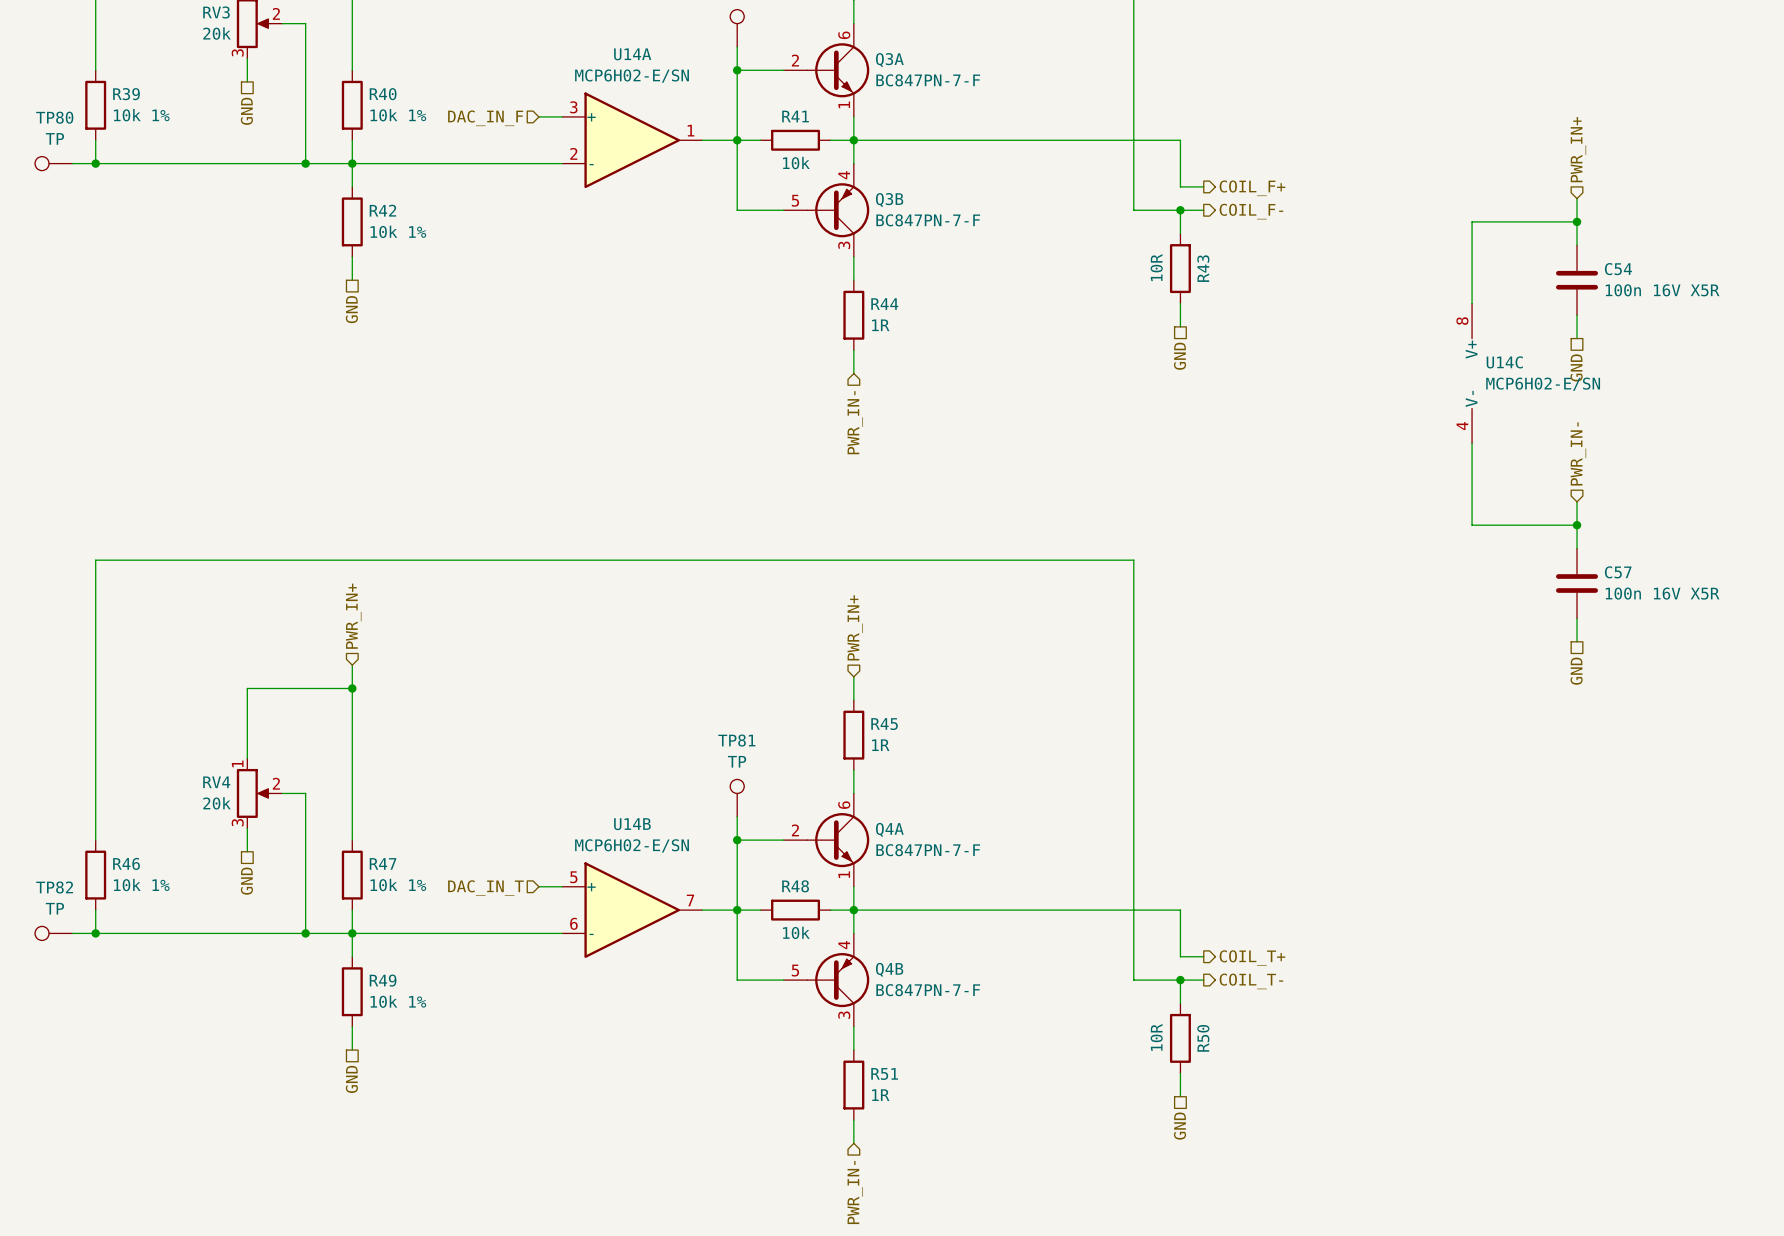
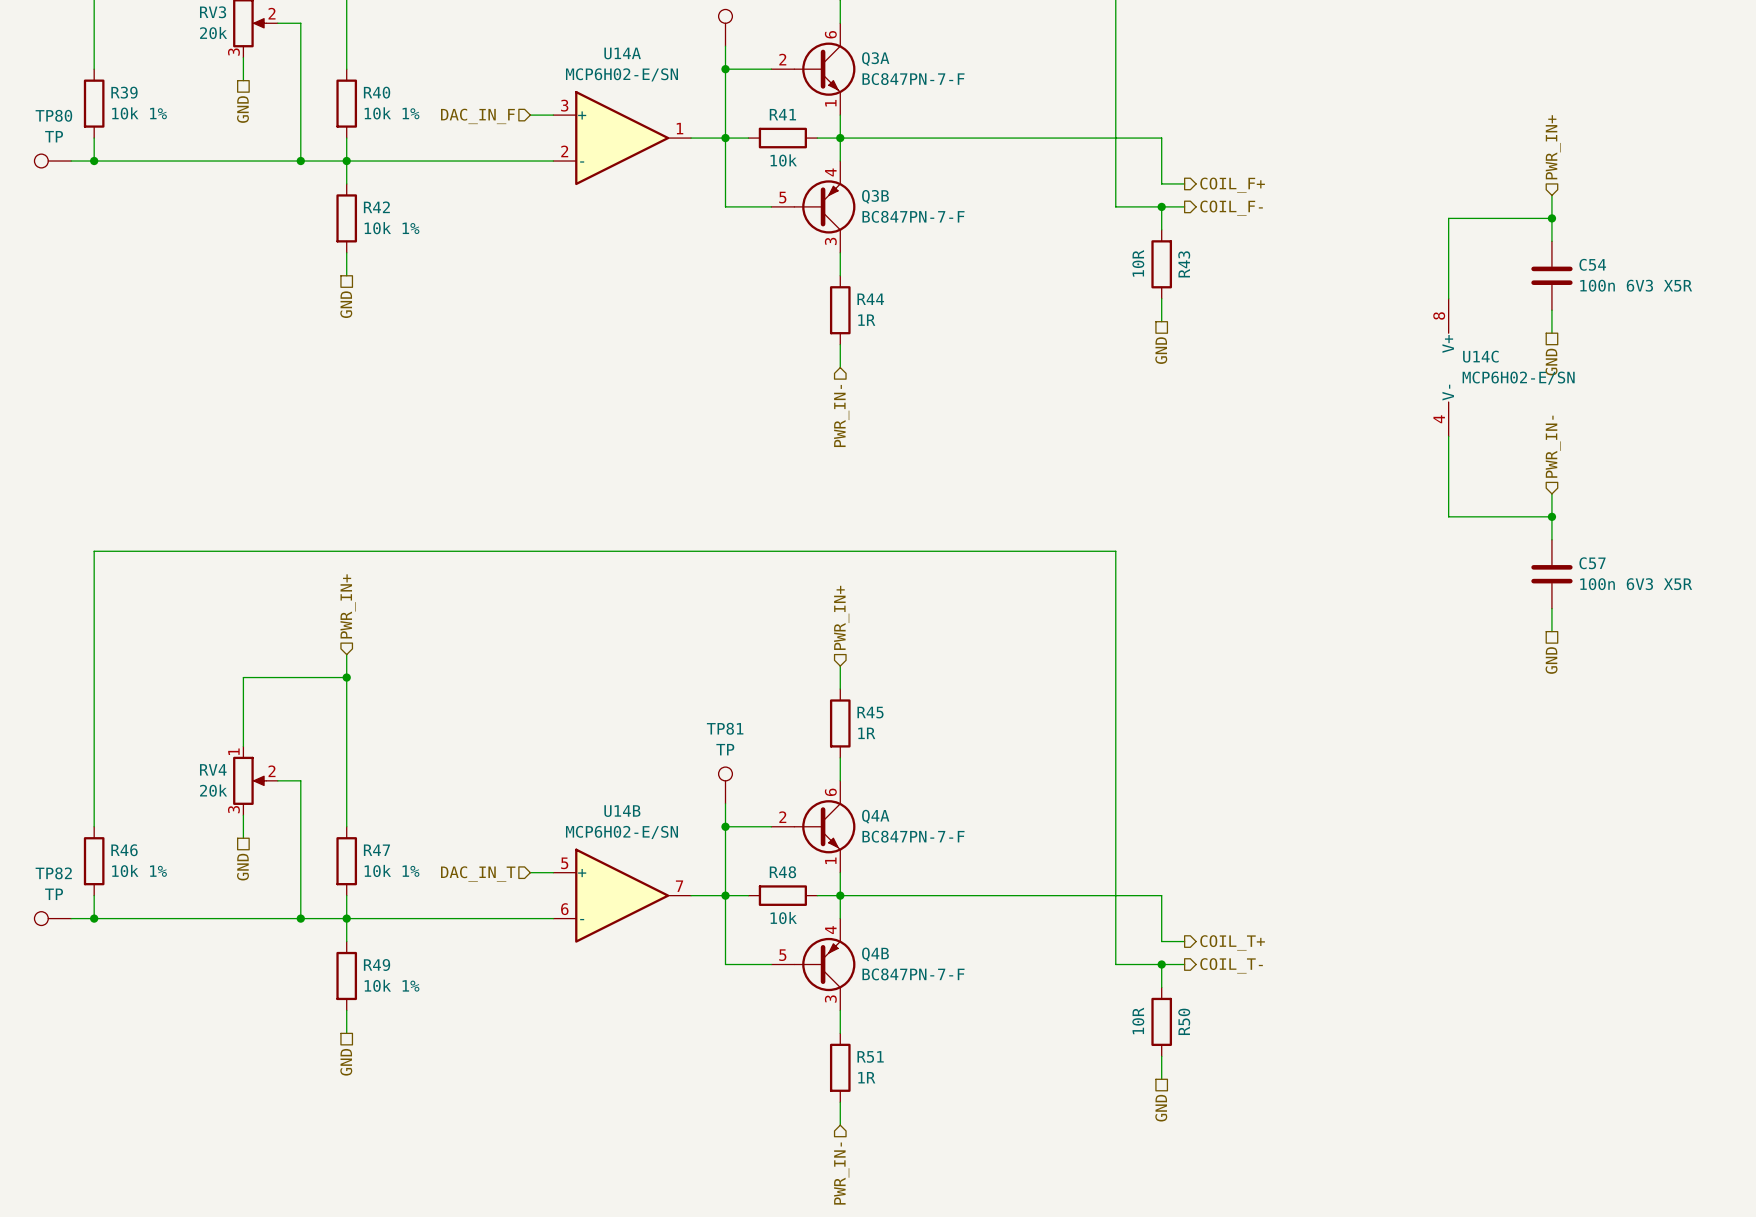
C54 value: 100n 16V X5R (1662, 290) -> 100n 6V3 X5R (1636, 285)
C57 value: 100n 16V X5R (1662, 593) -> 100n 6V3 X5R (1636, 584)

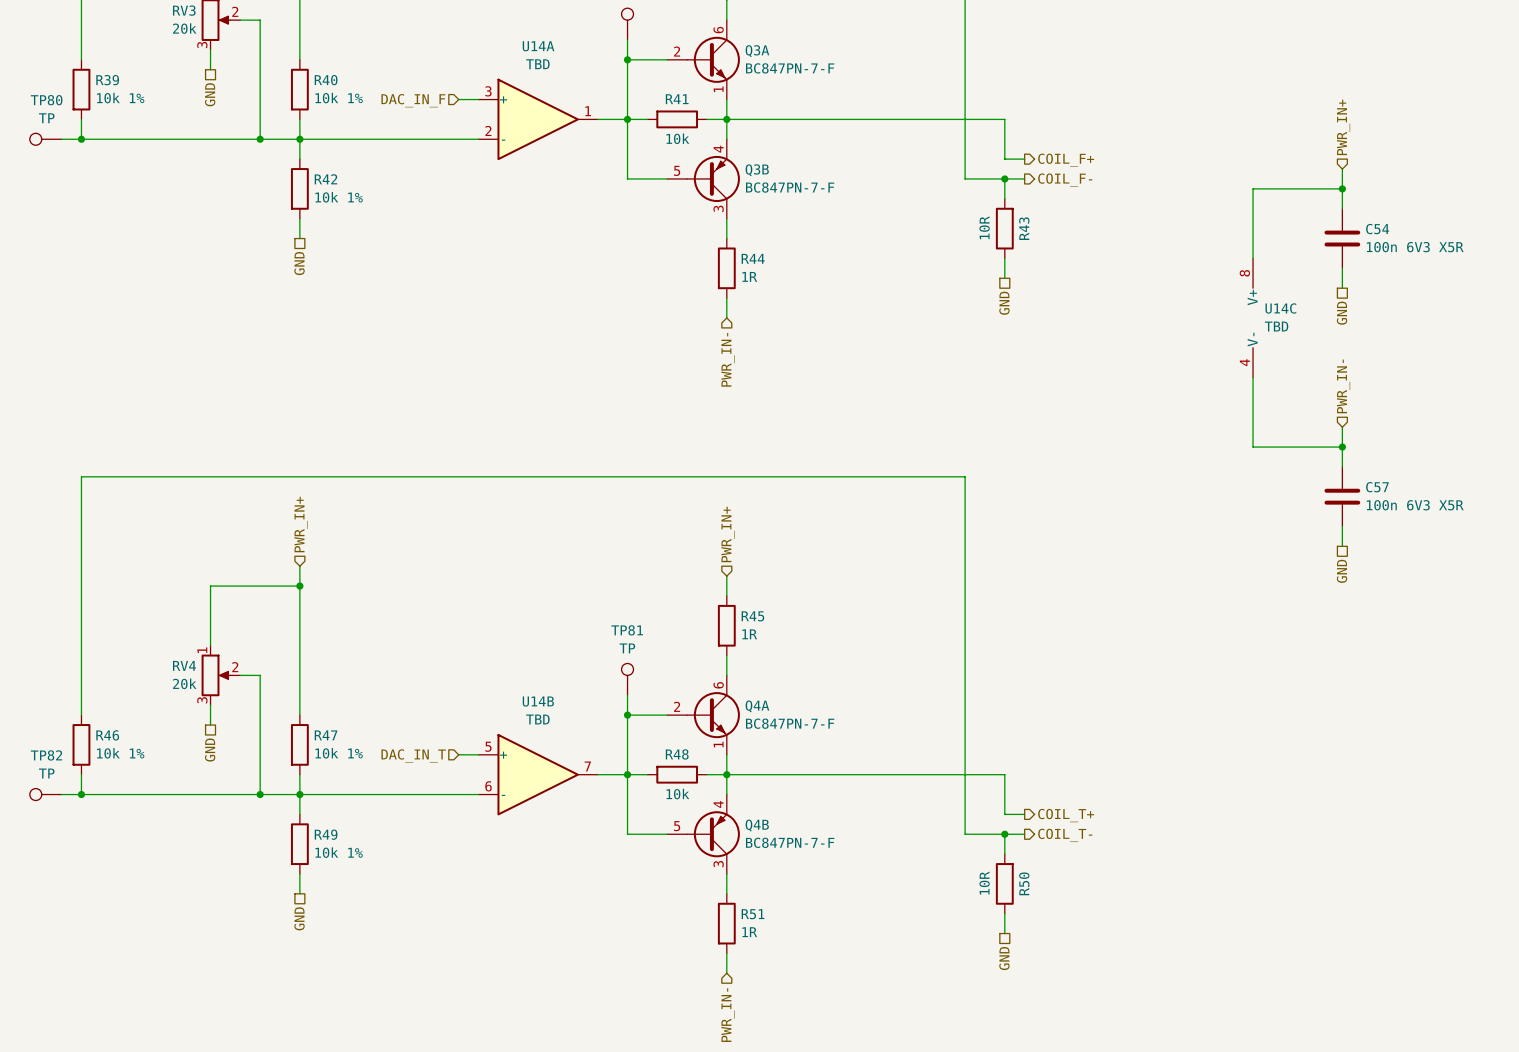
U14A value: MCP6H02-E/SN (621, 74) -> TBD (537, 64)
U14C value: MCP6H02-E/SN (1518, 378) -> TBD (1276, 326)
U14B value: MCP6H02-E/SN (621, 832) -> TBD (537, 719)

